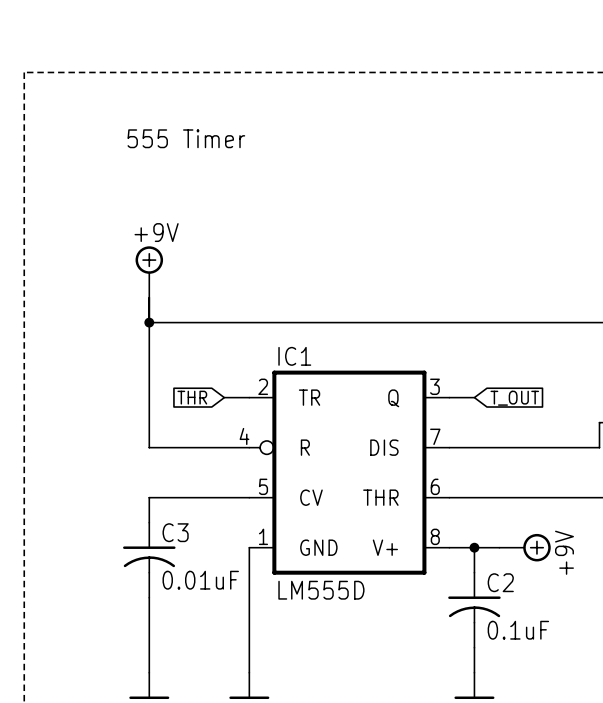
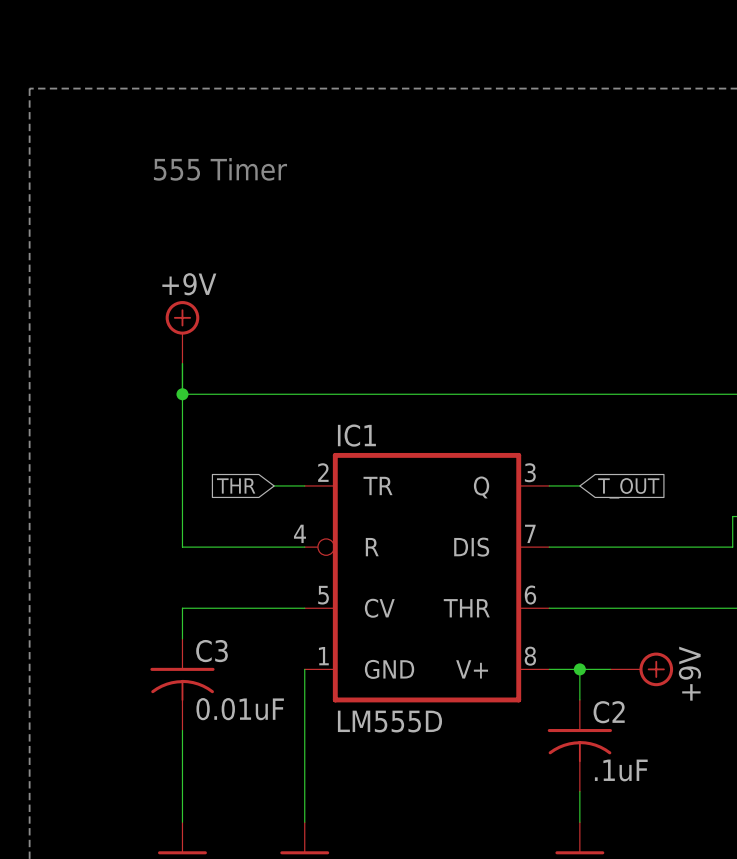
C2 value: 0.1uF (518, 630) -> .1uF (621, 770)

